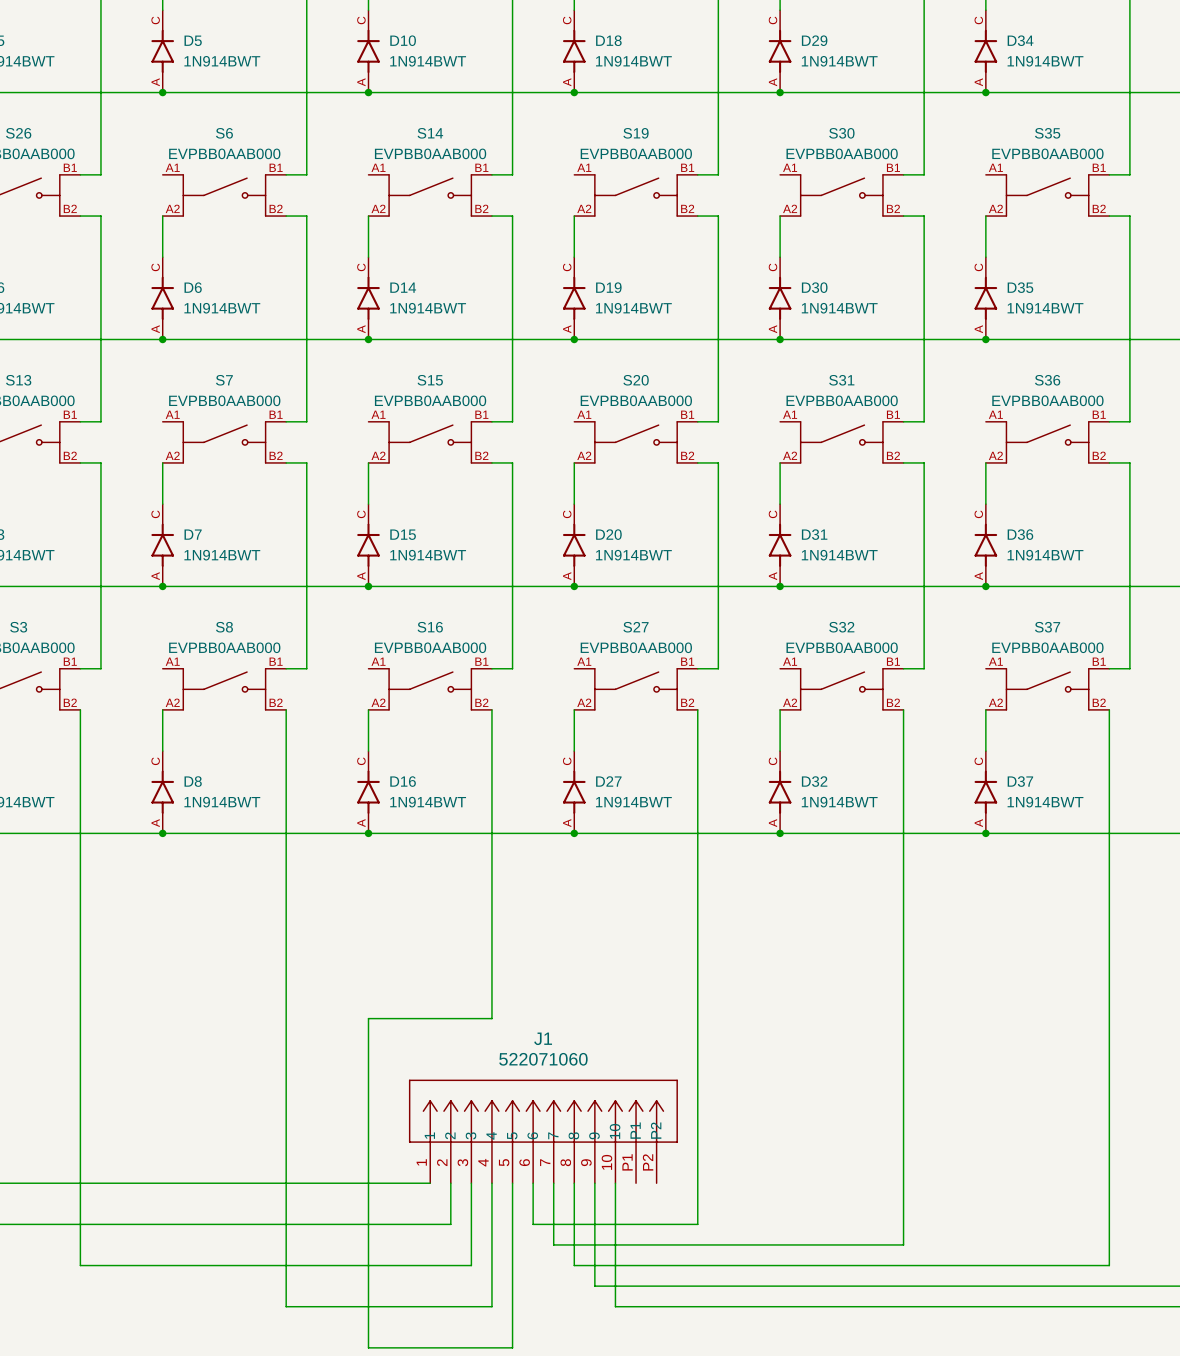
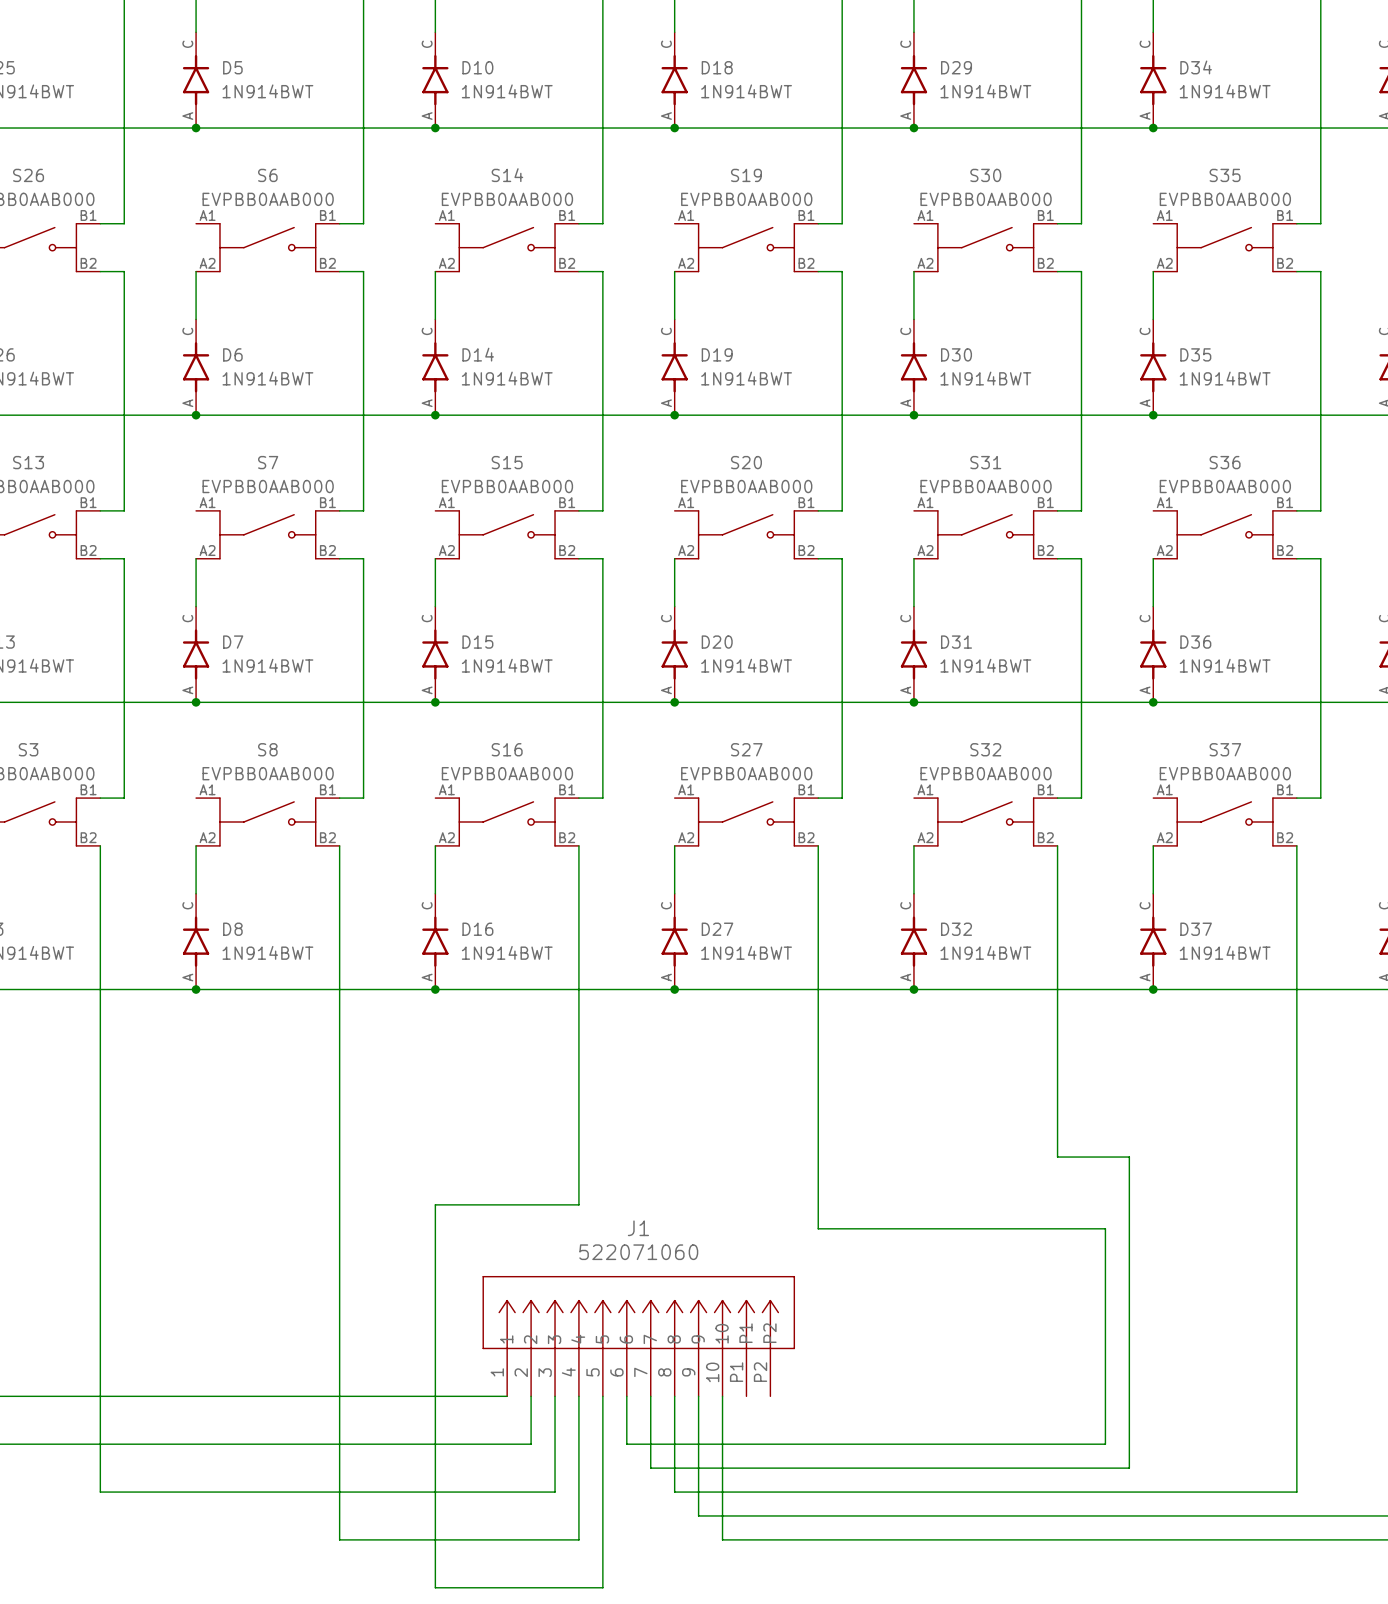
wire: (903, 977) (903, 1244) -> (1057, 1157) (1129, 1157) (1129, 1468) (1057, 1468)
wire: (697, 1039) (697, 1224) -> (818, 1228) (1105, 1228) (1105, 1444) (818, 1444)

